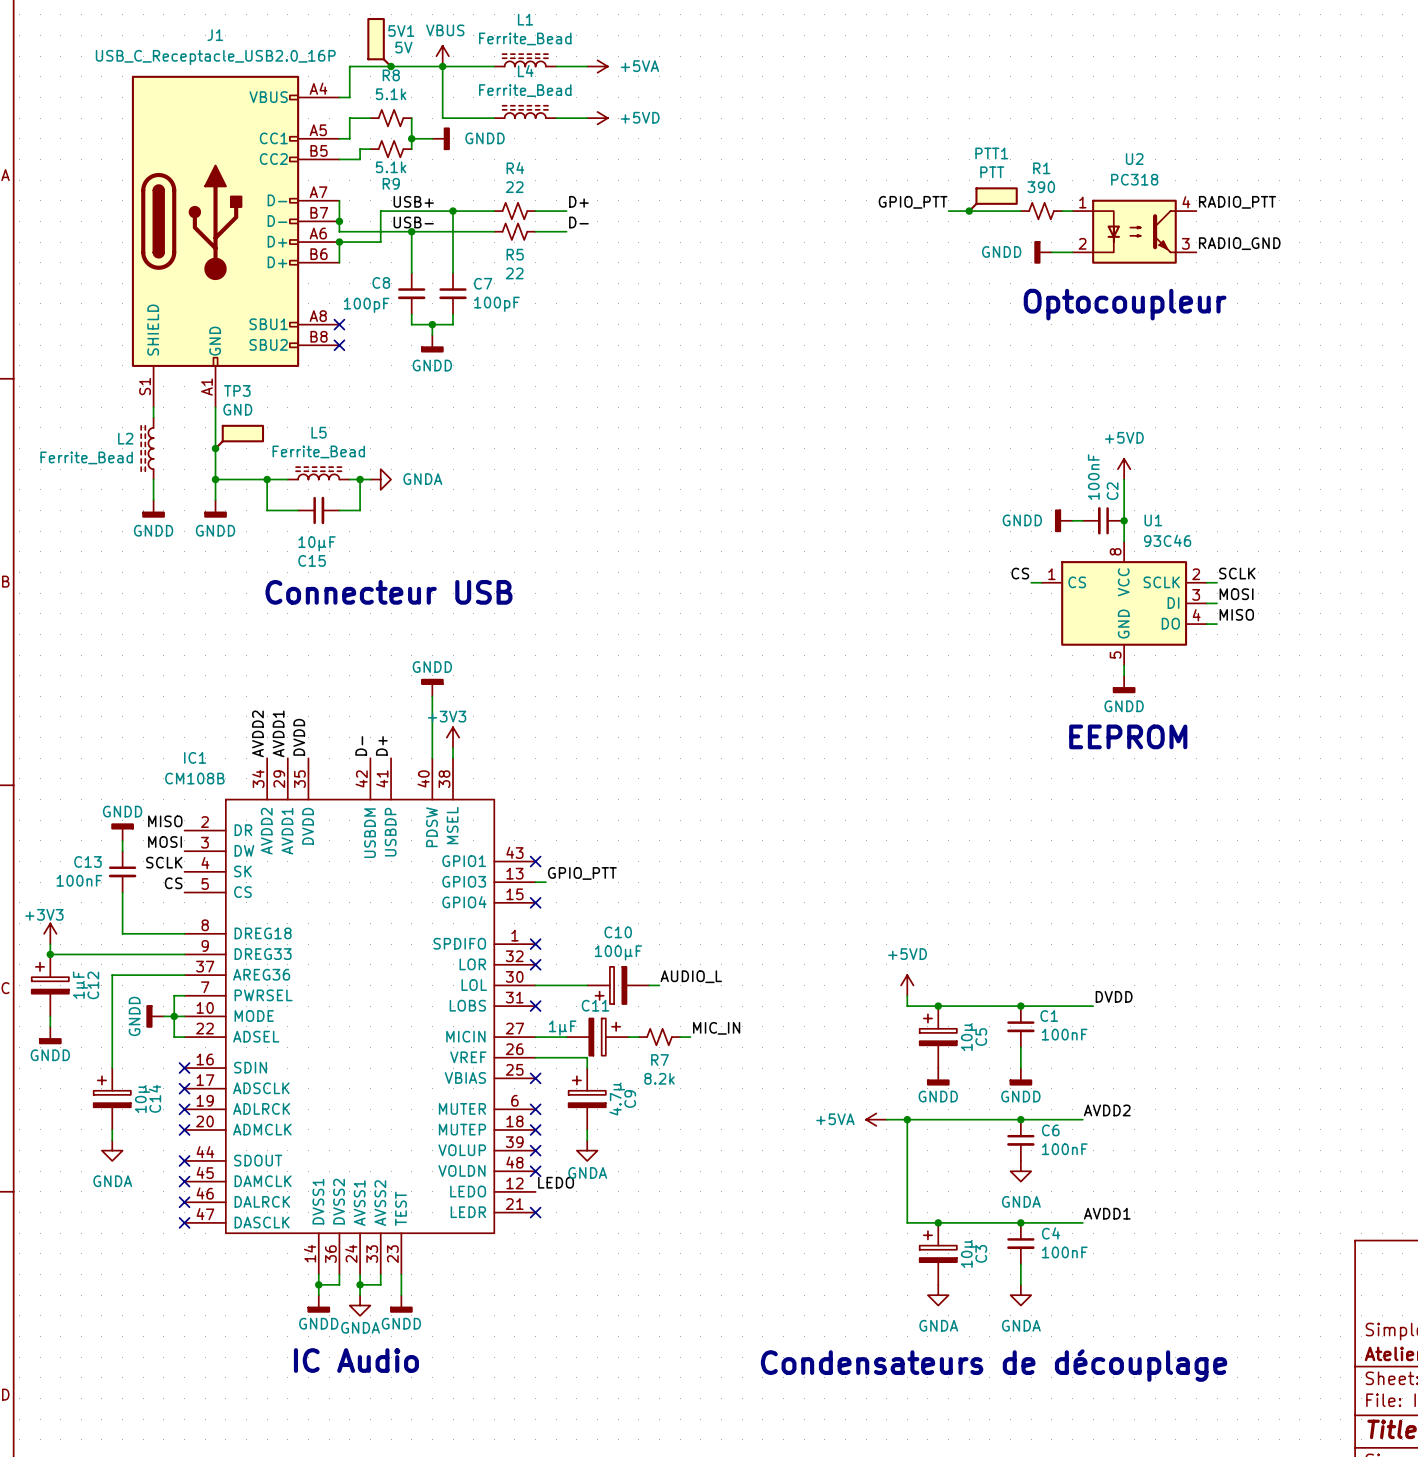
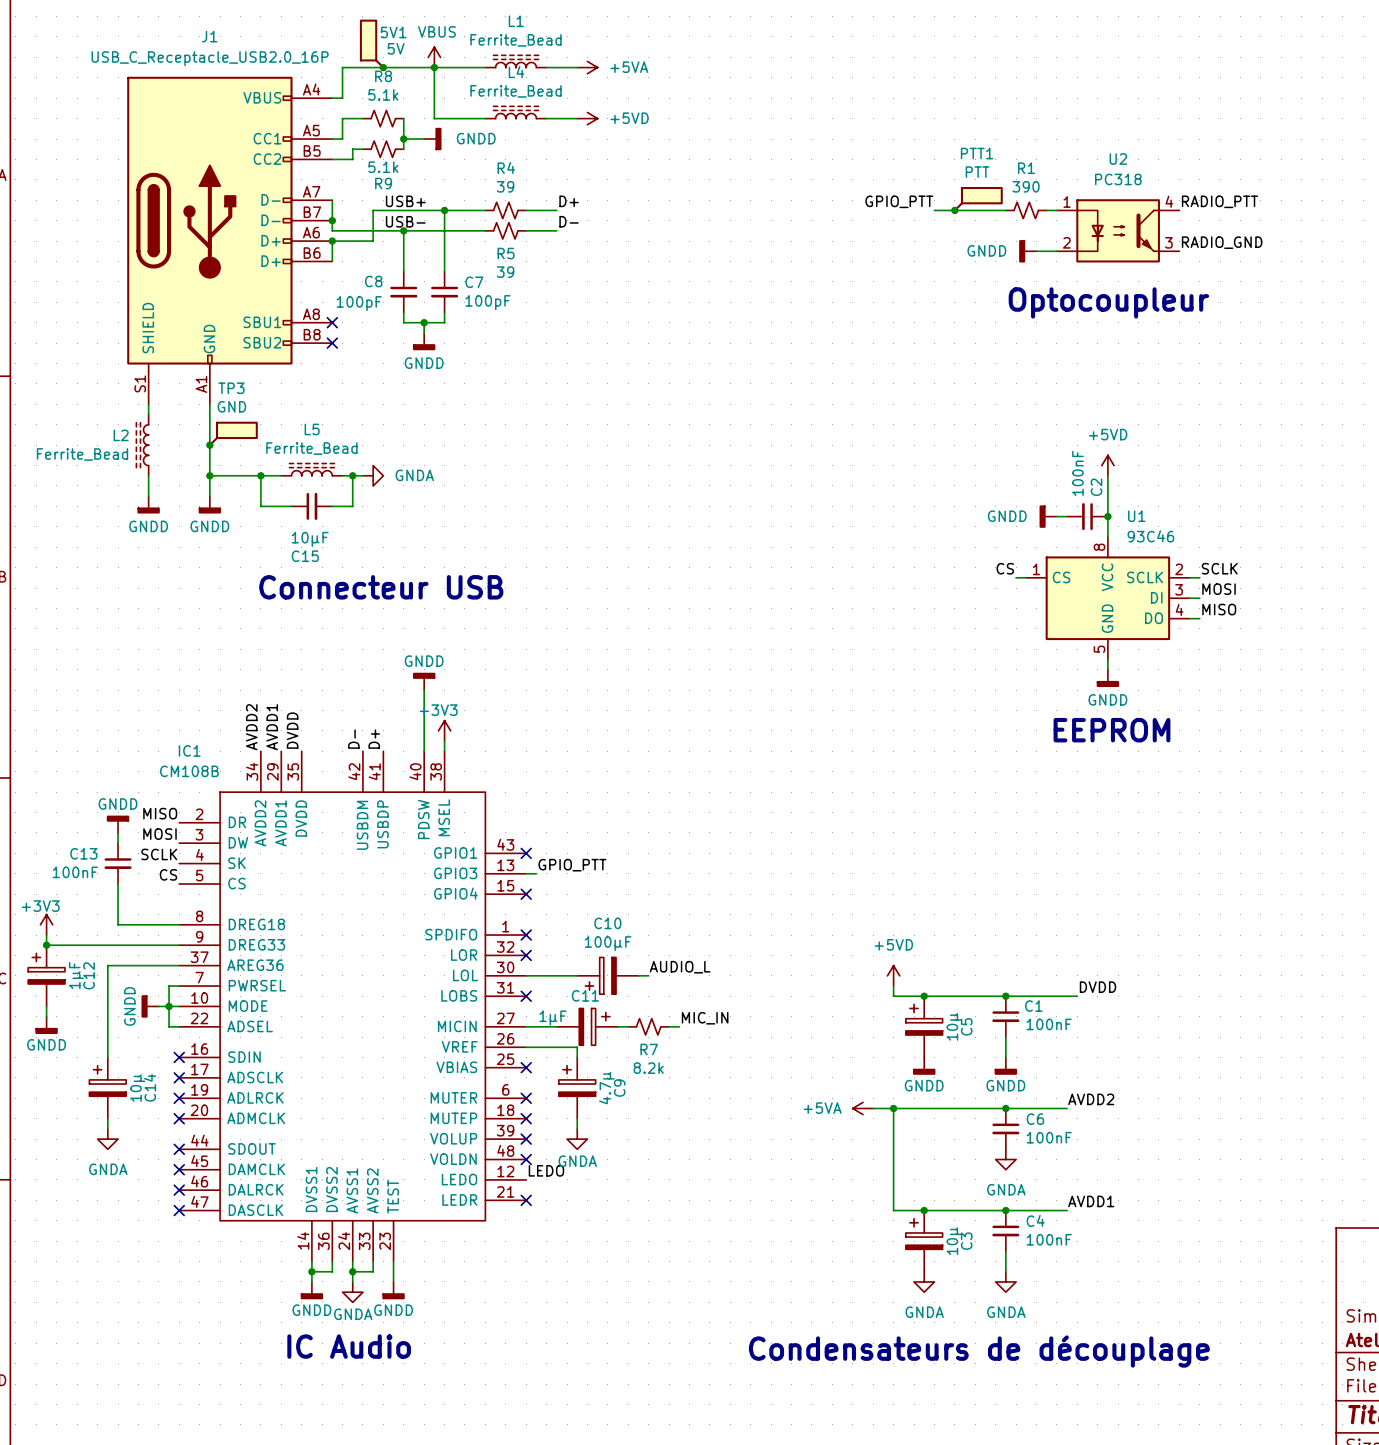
R4 value: 22 (514, 187) -> 39 (505, 186)
R5 value: 22 (514, 273) -> 39 (505, 272)

